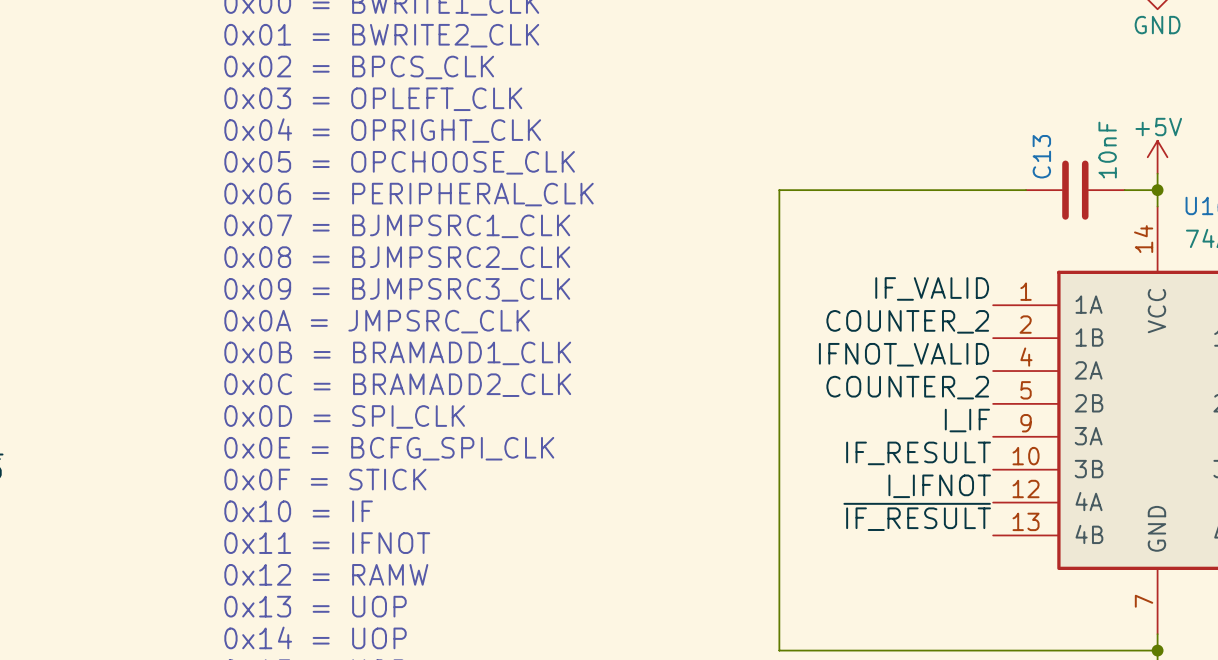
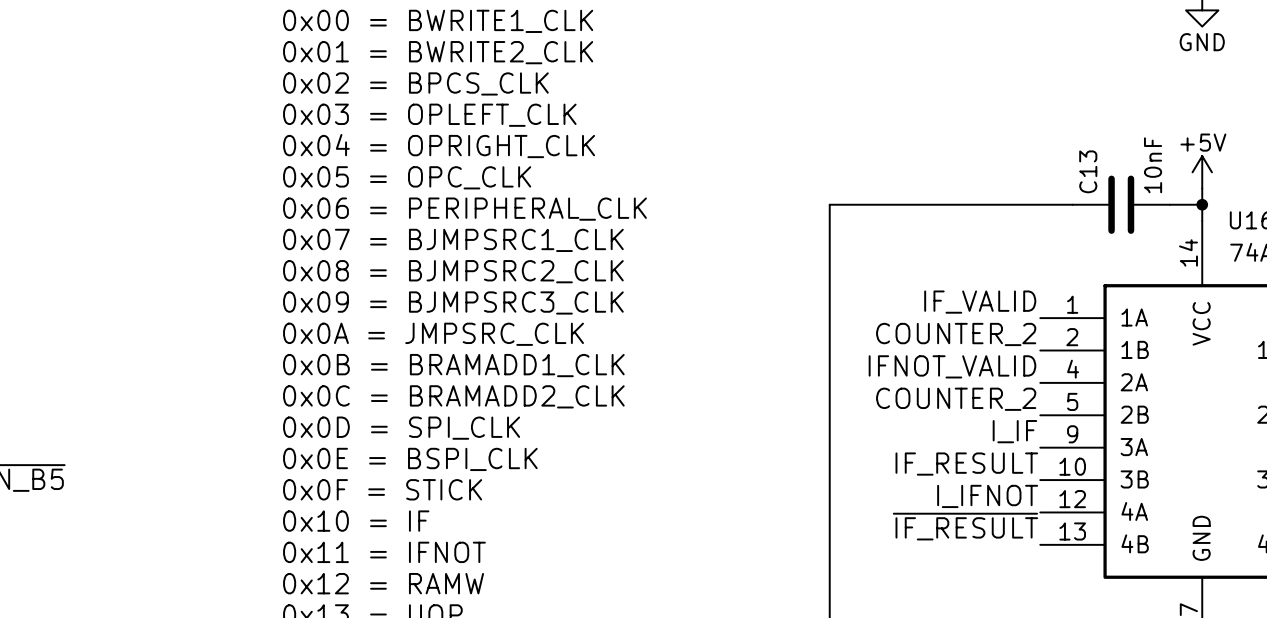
text: 0x05 = OPCHOOSE_CLK (399, 162) -> 0x05 = OPC_CLK (407, 177)
text: 0x0E = BCFG_SPI_CLK (389, 448) -> 0x0E = BSPI_CLK (410, 459)

